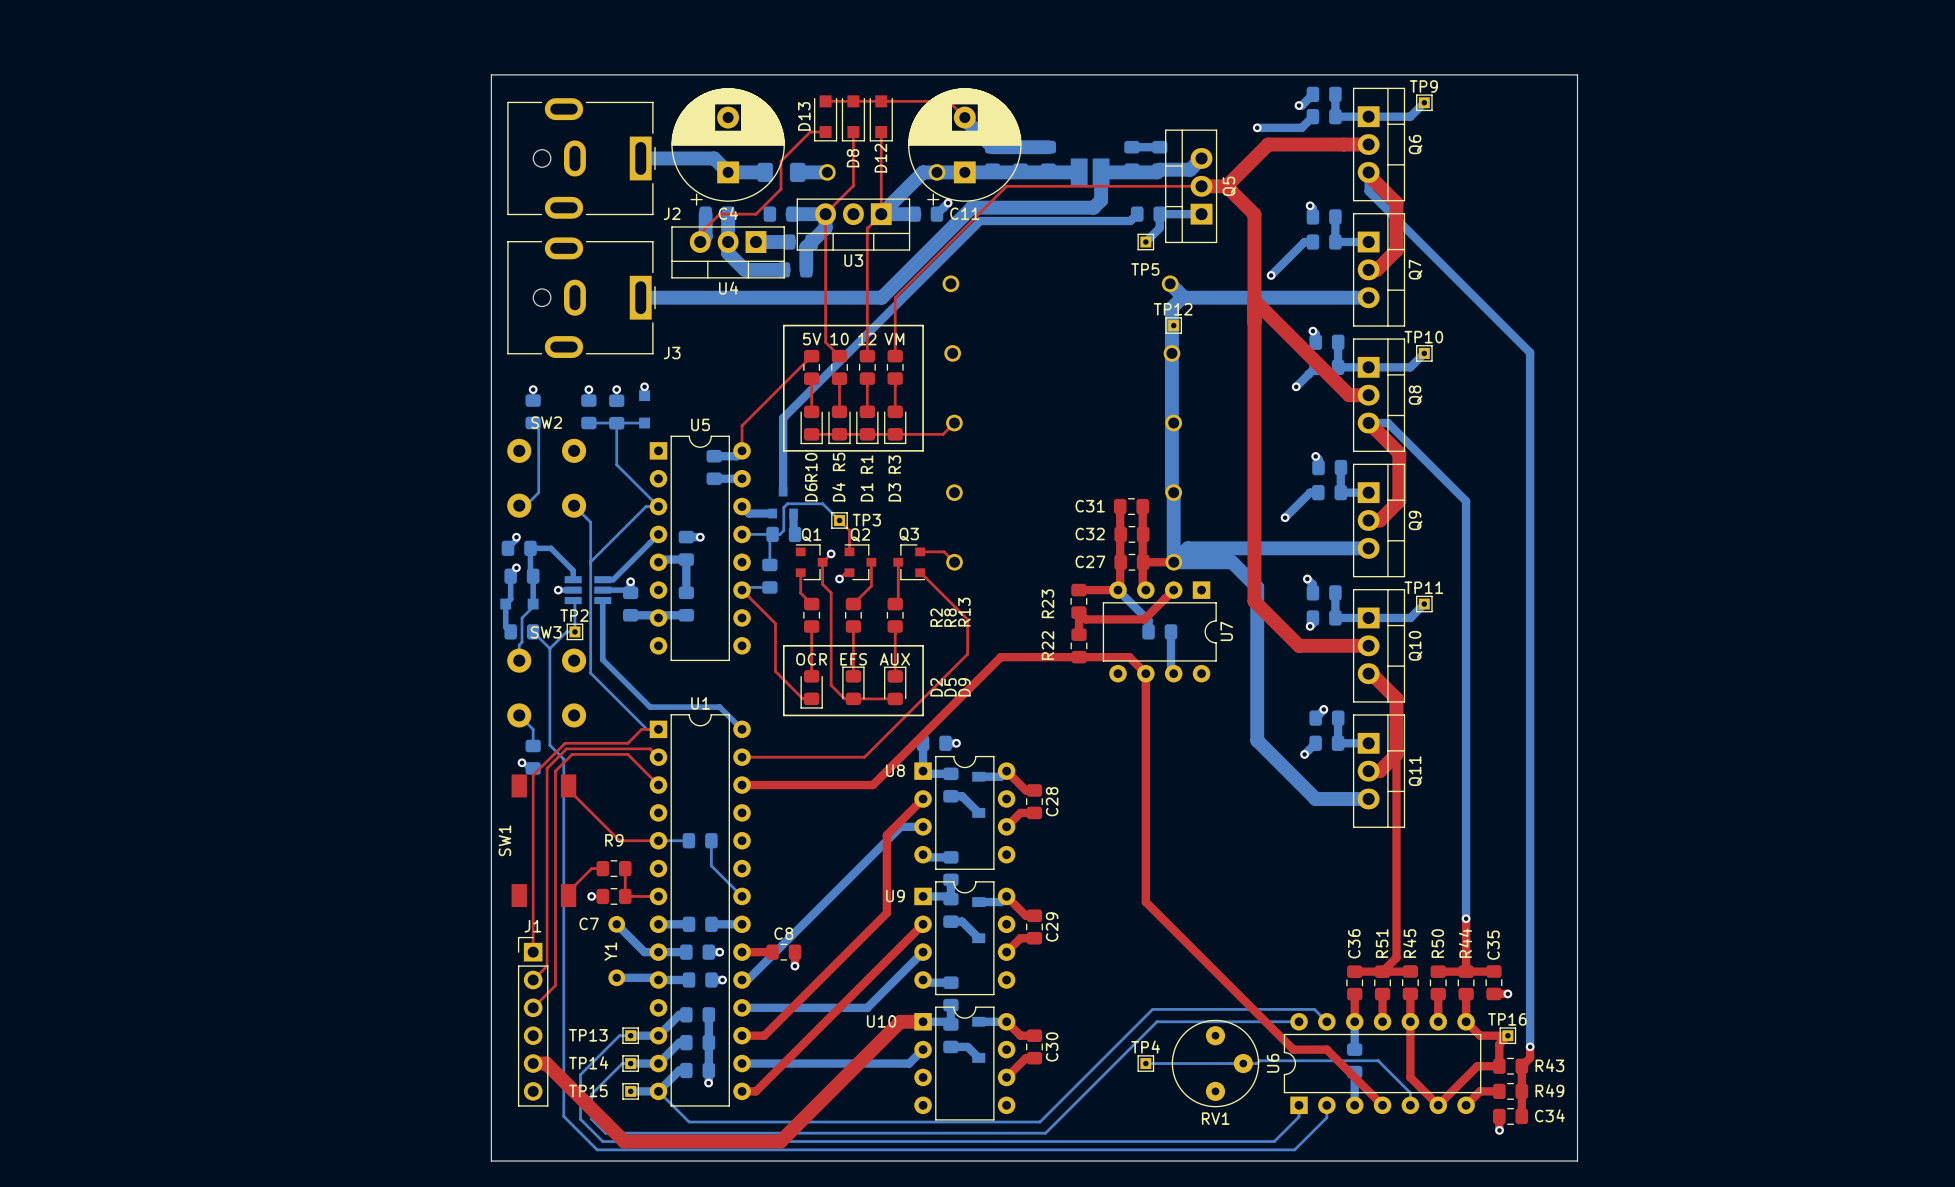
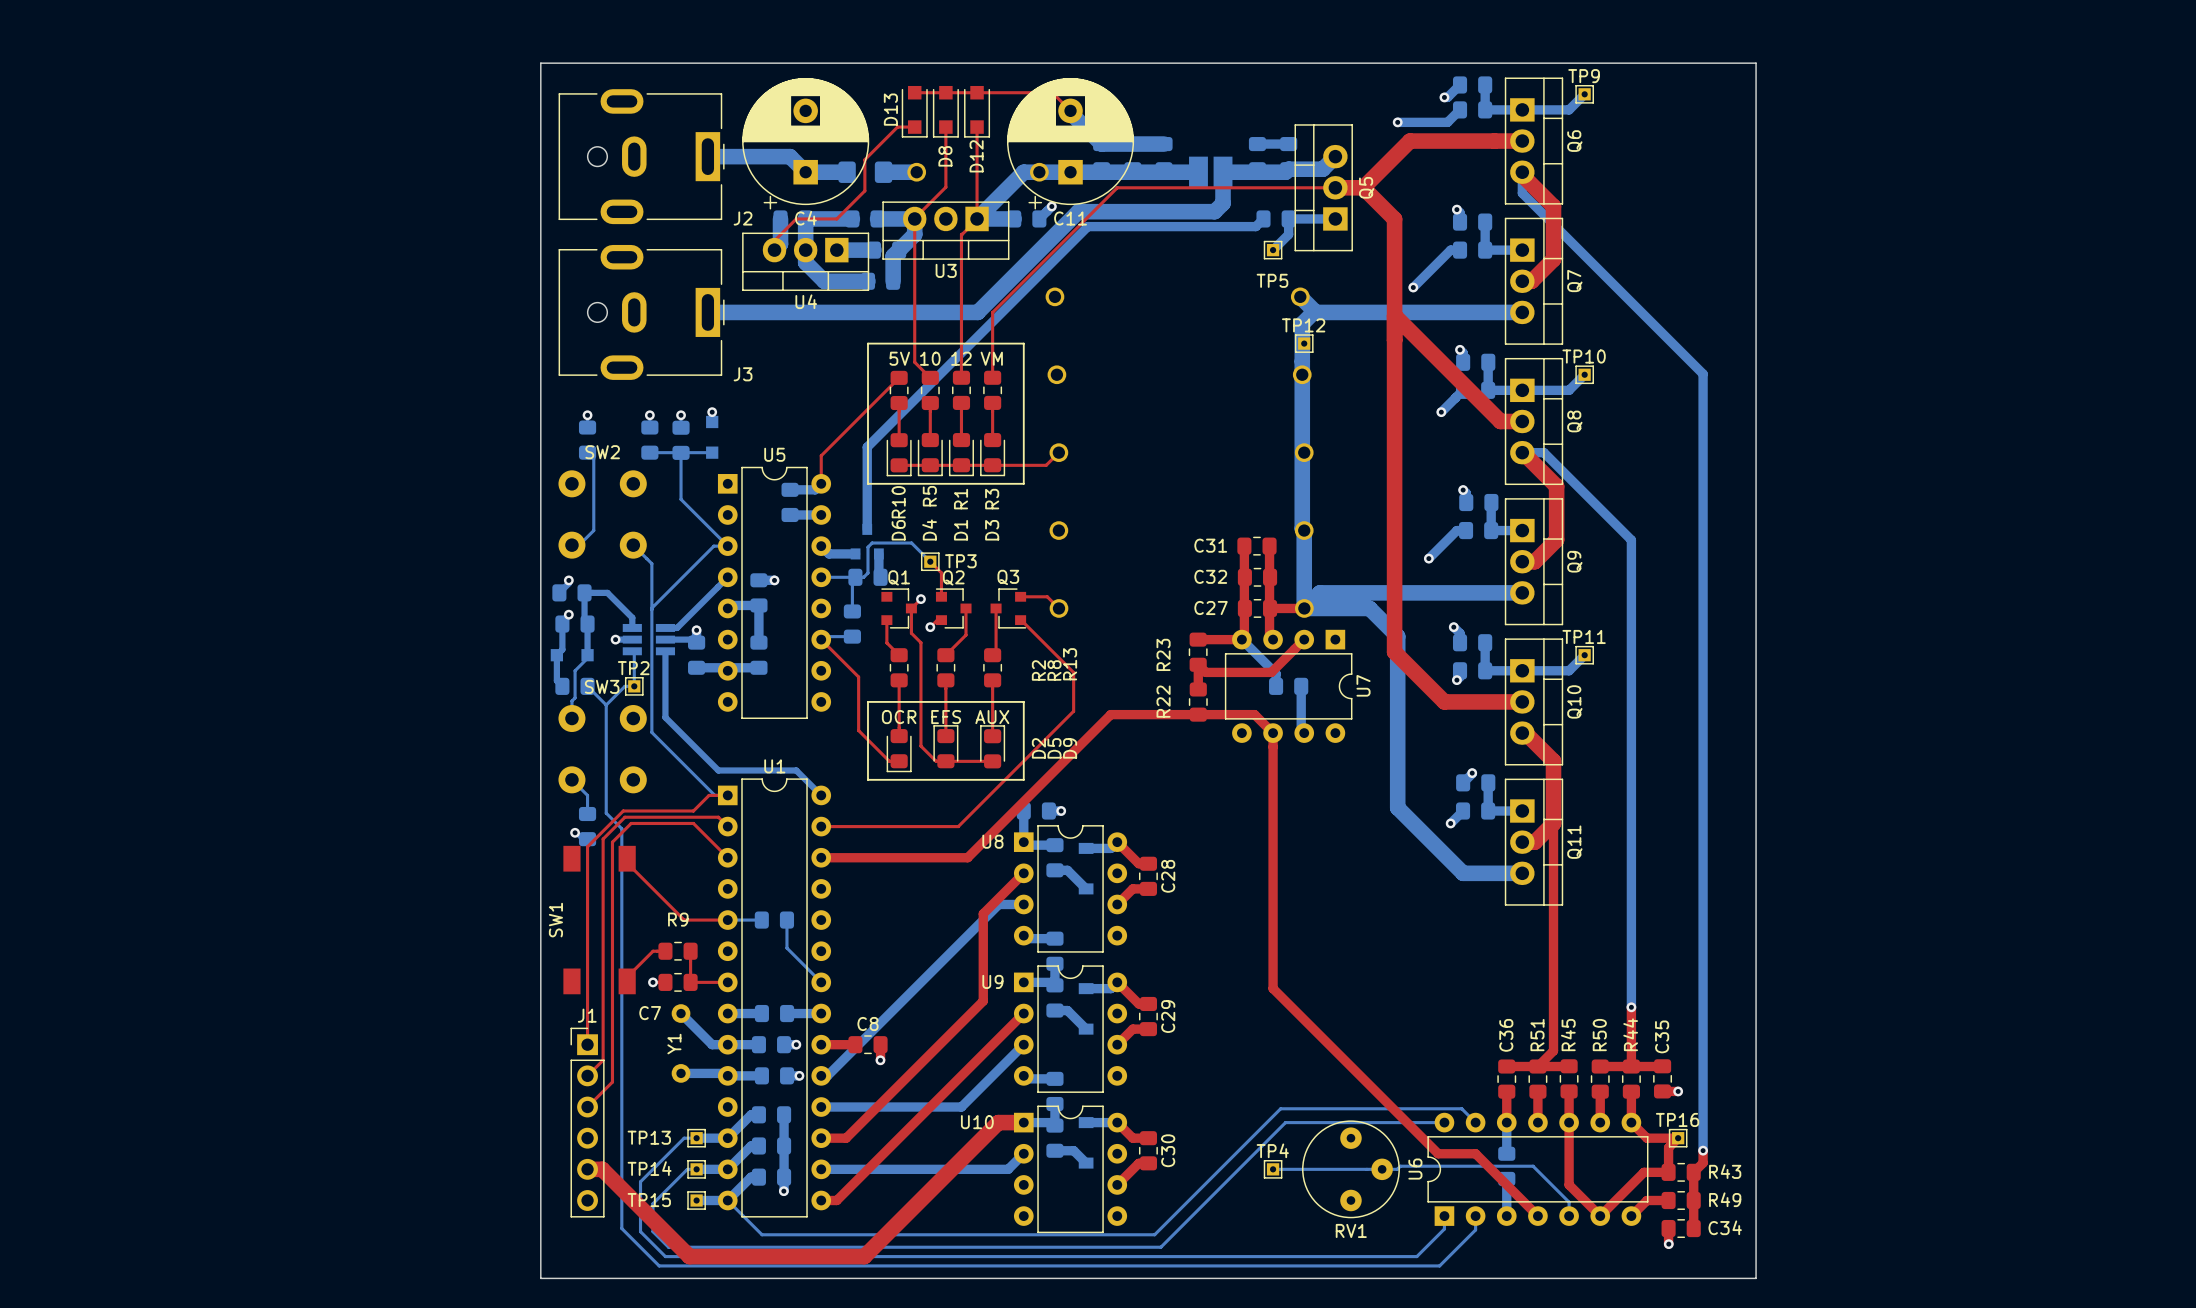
bottom track: none -> (805, 218) (852, 218)

